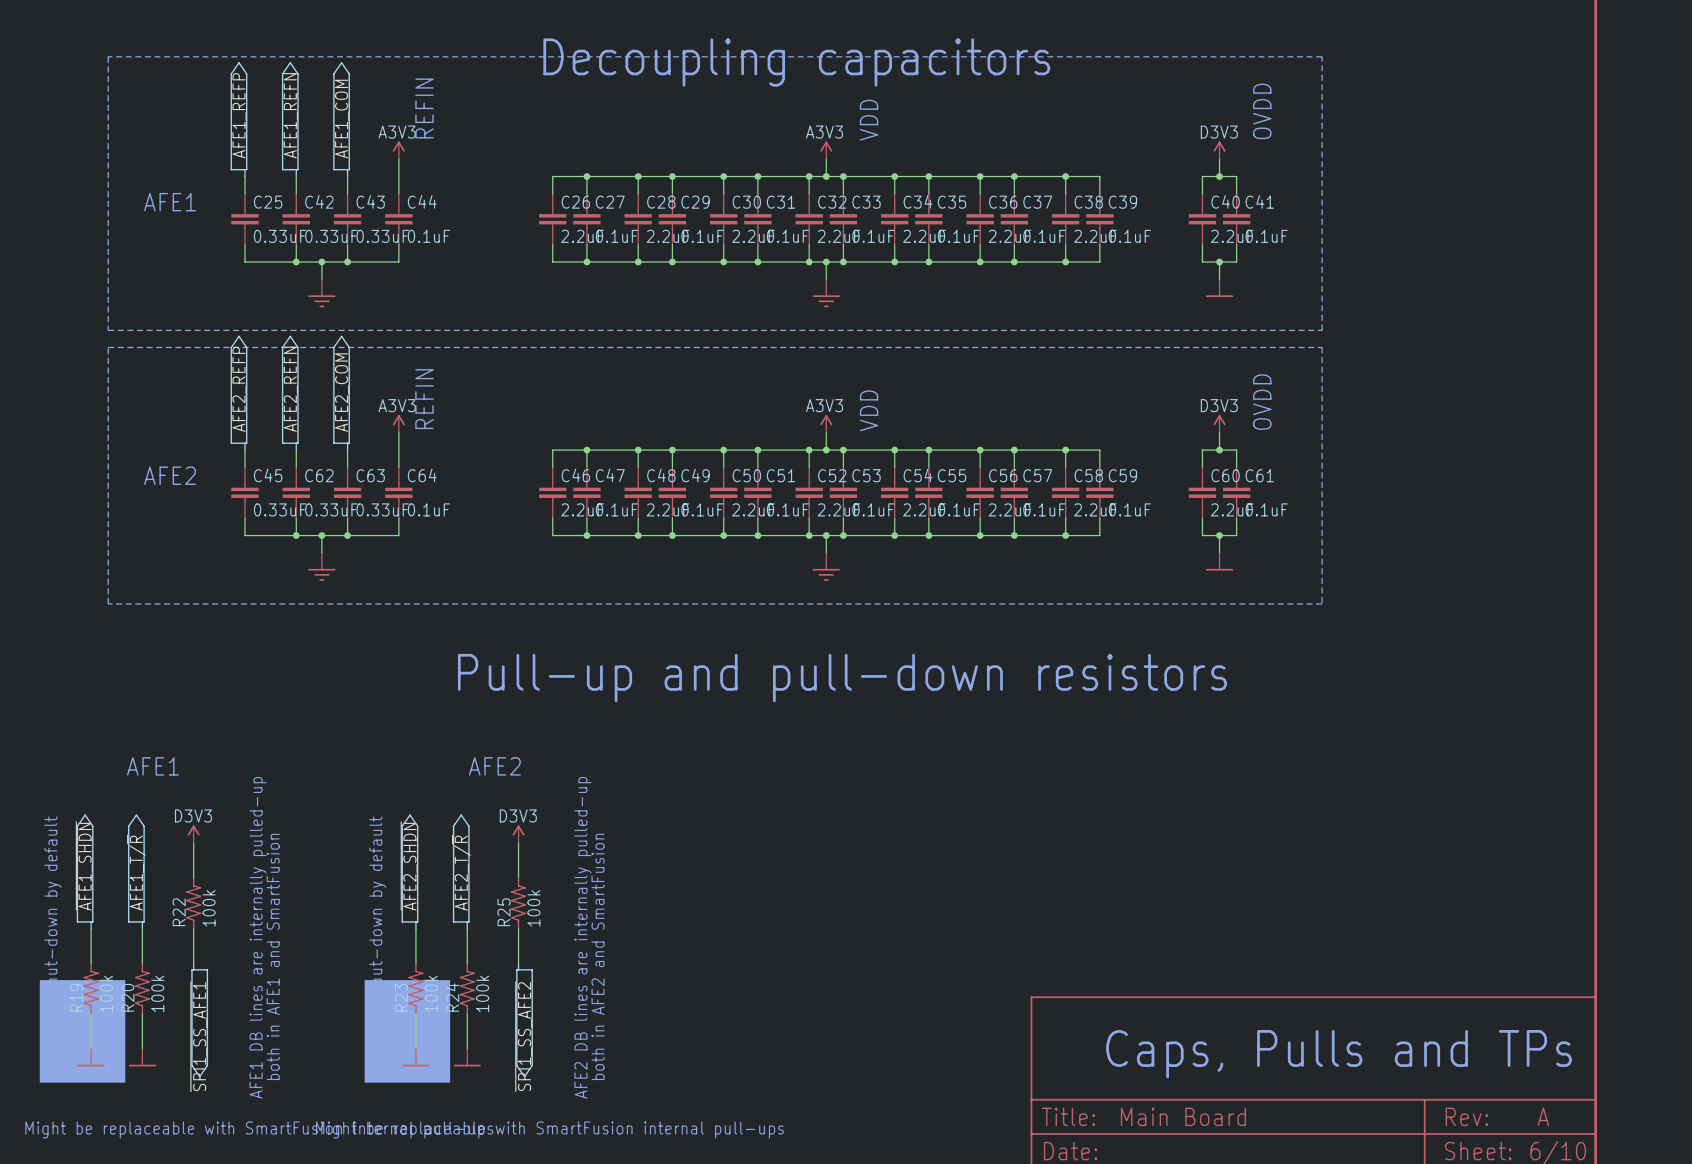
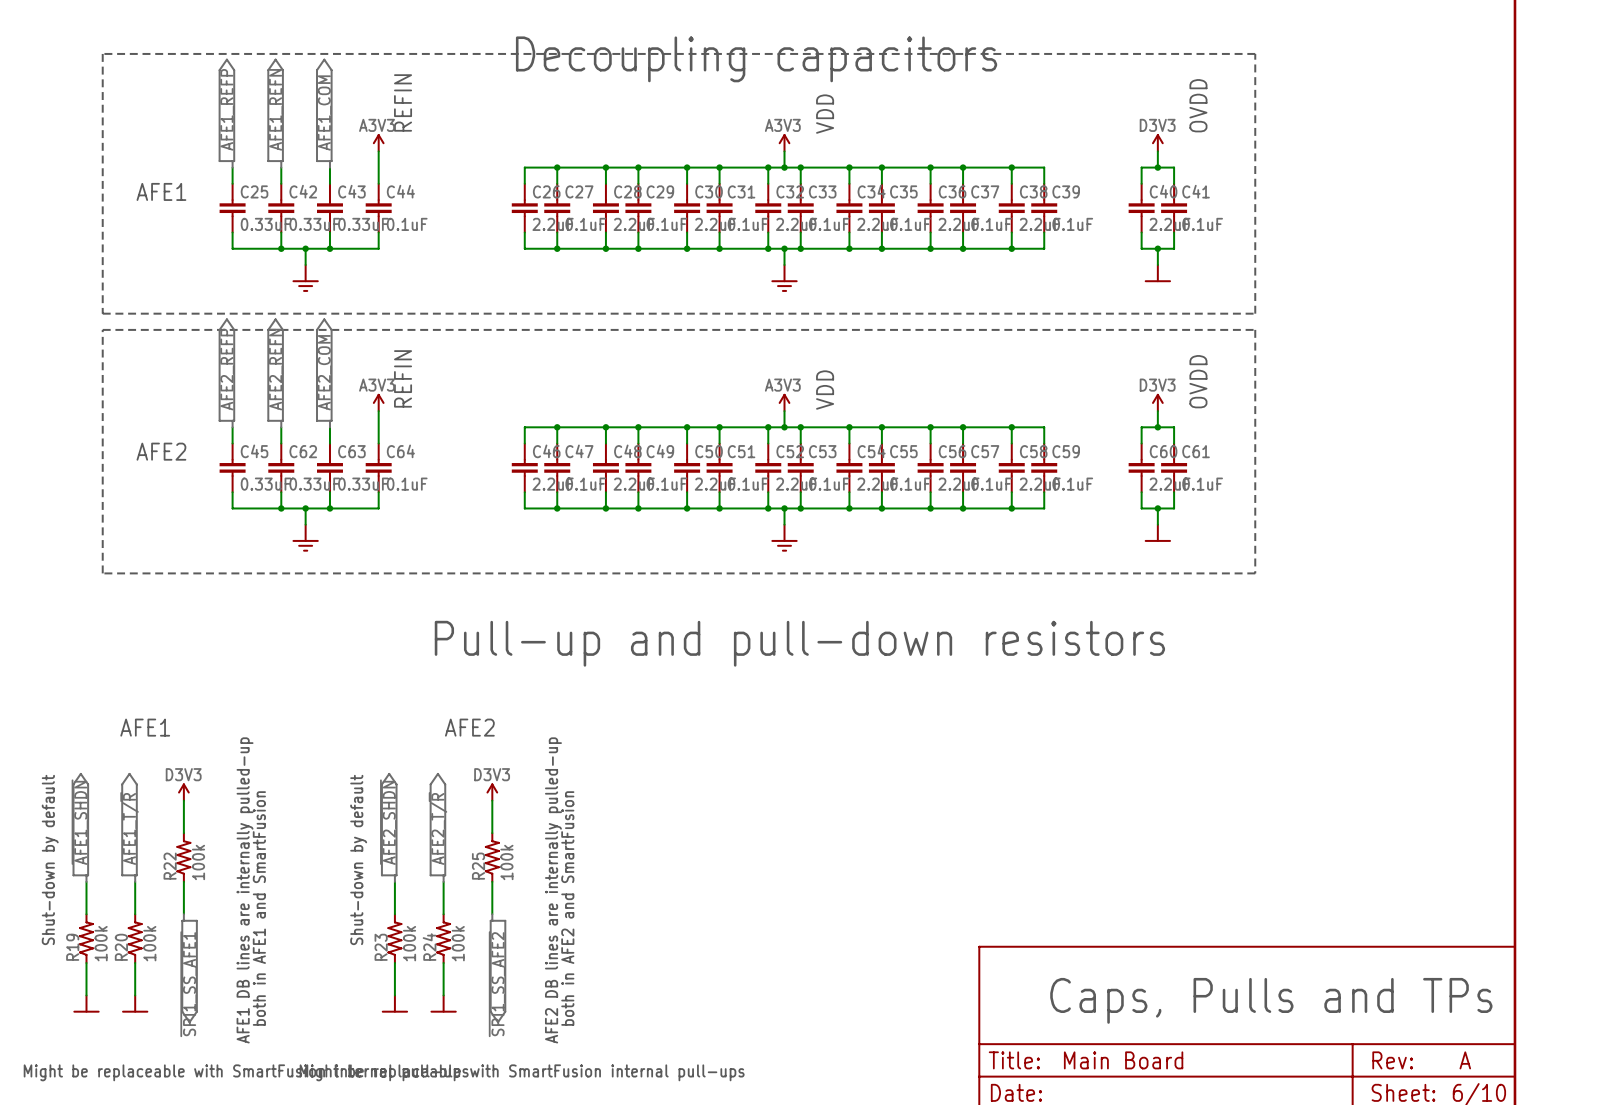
drawing: [39, 980, 126, 1083] -> none
drawing: [364, 980, 451, 1083] -> none

